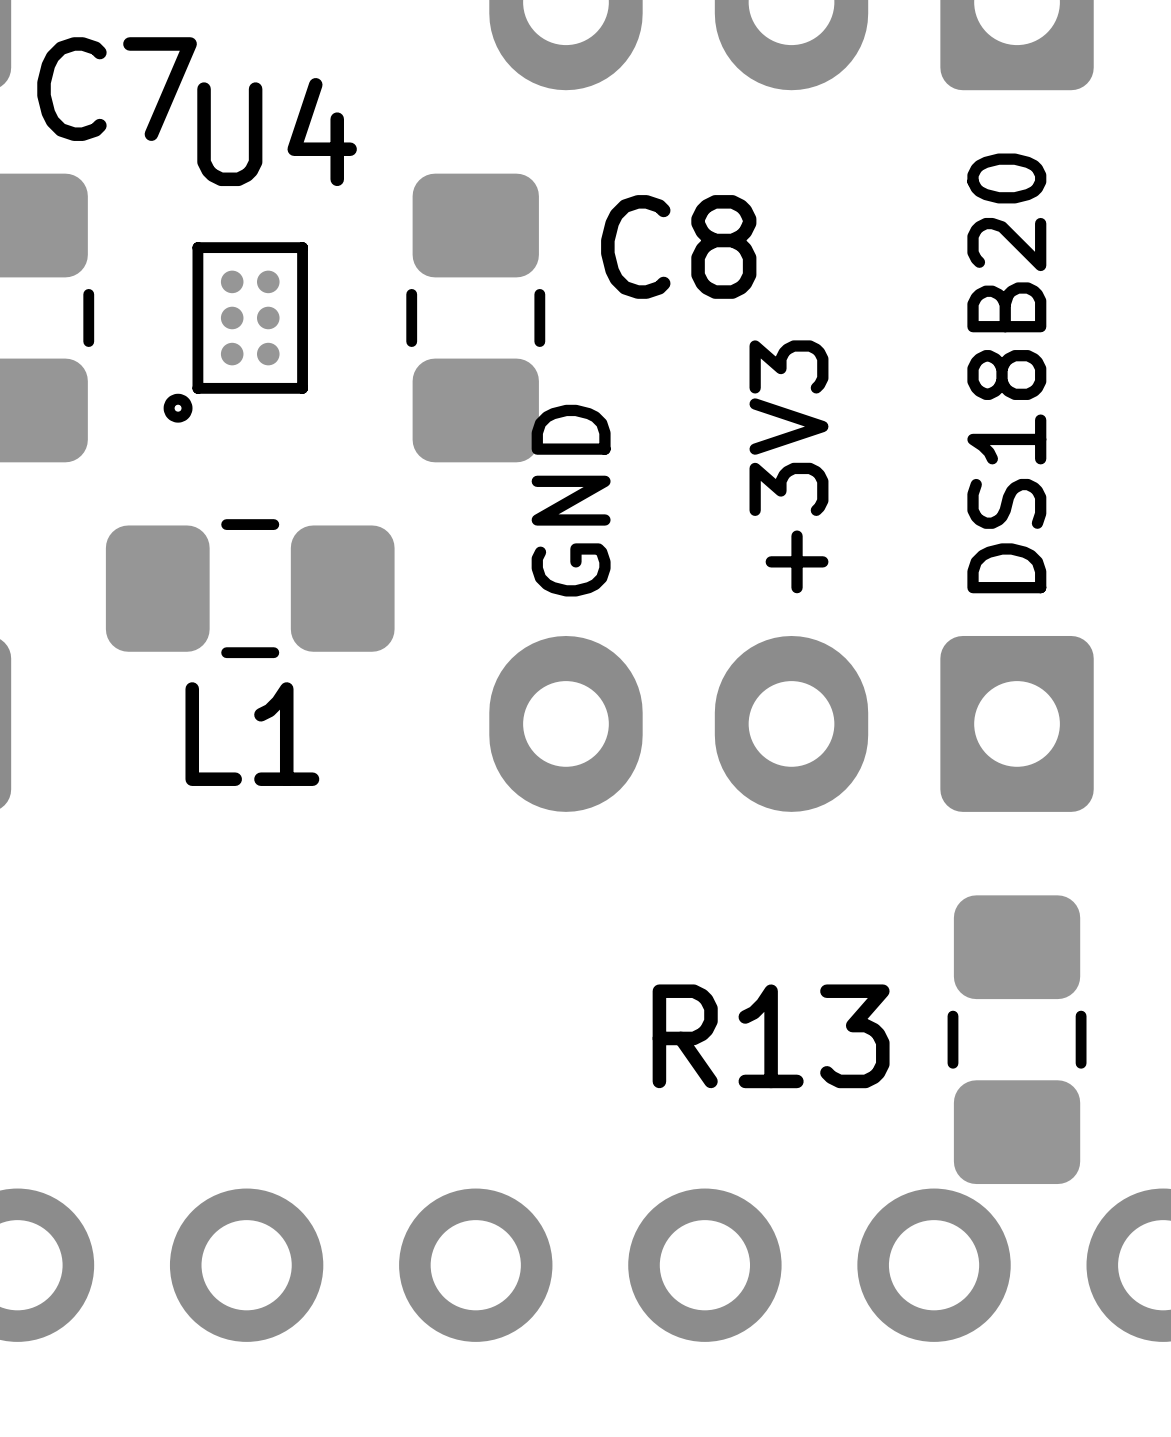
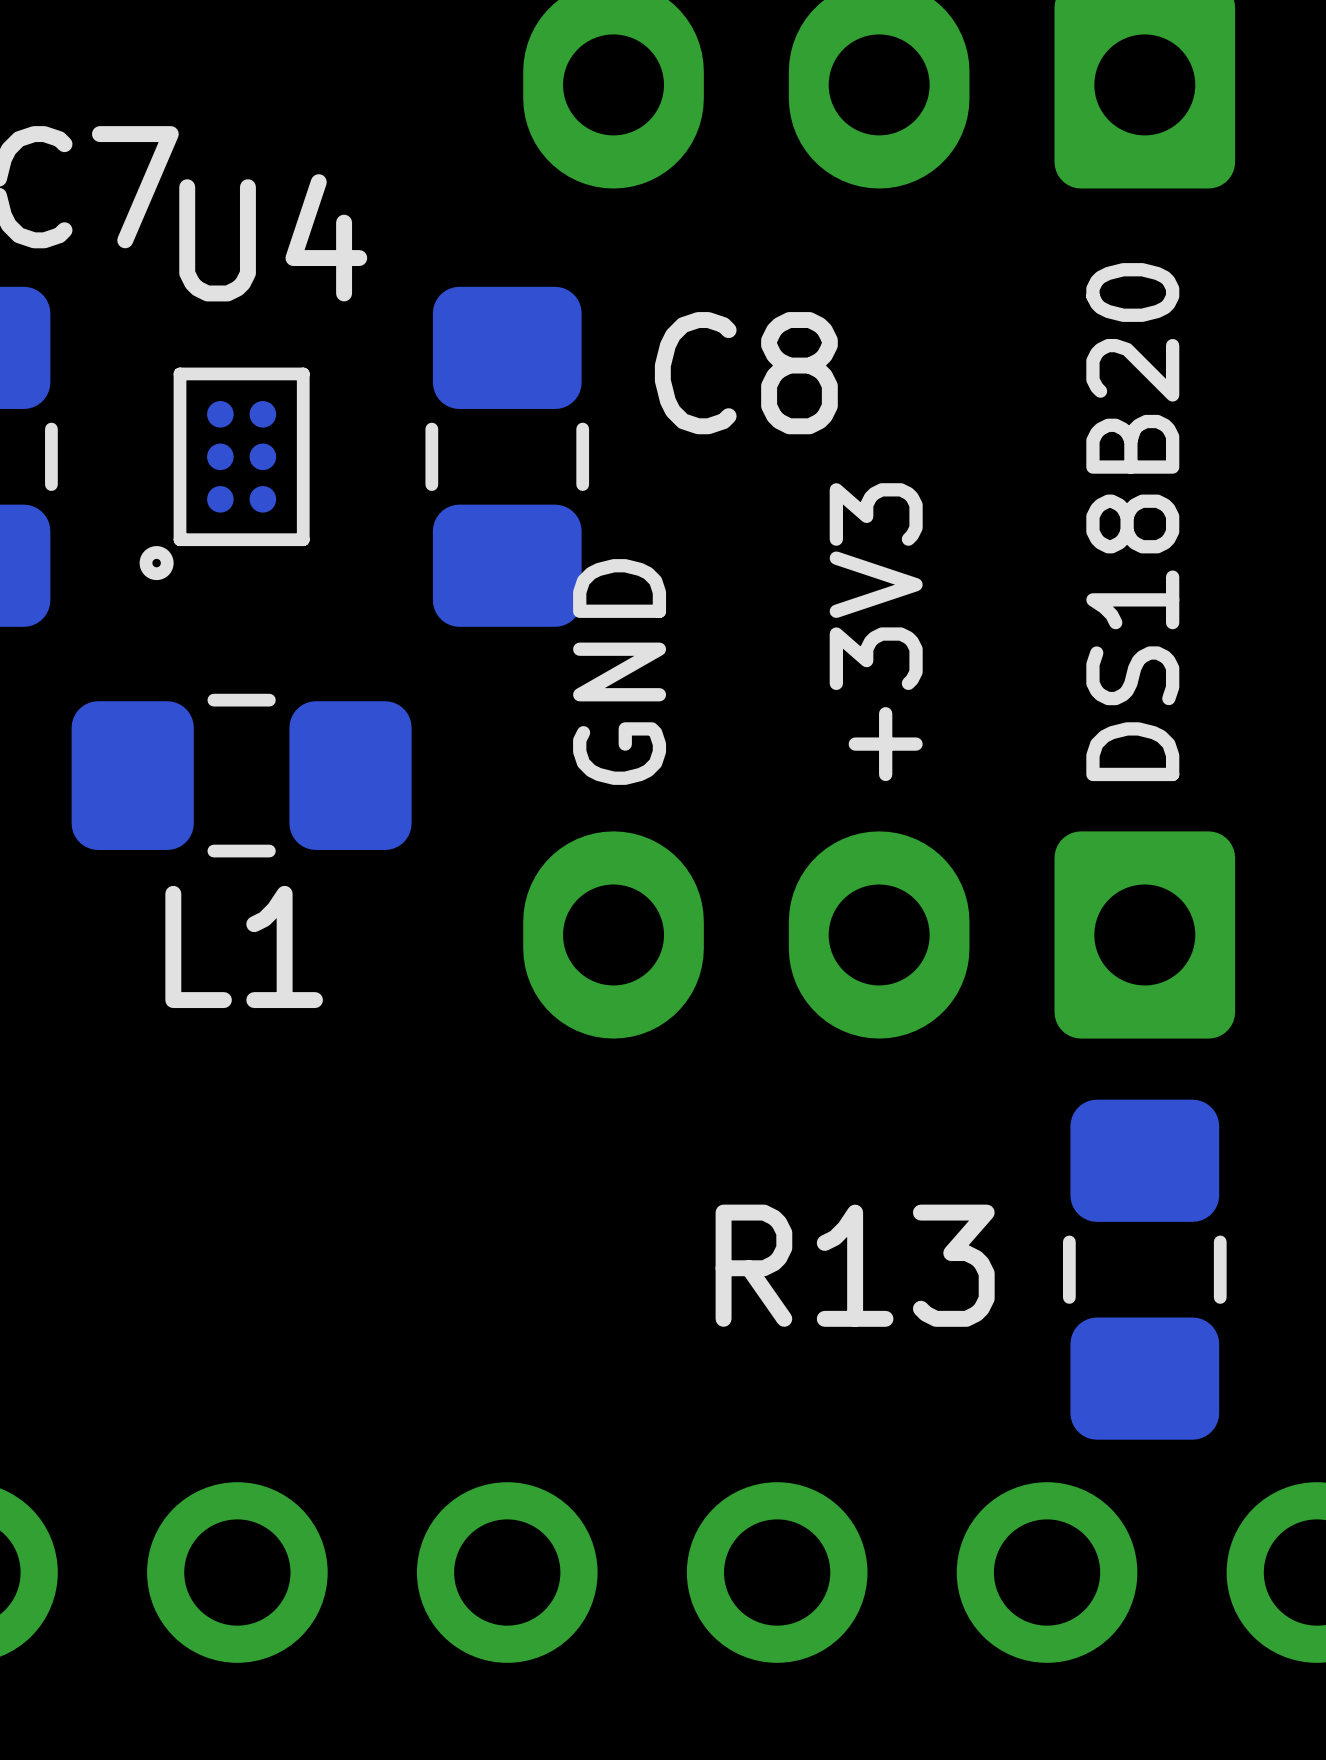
R13 position: (1017, 1039) -> (1144, 1269)

